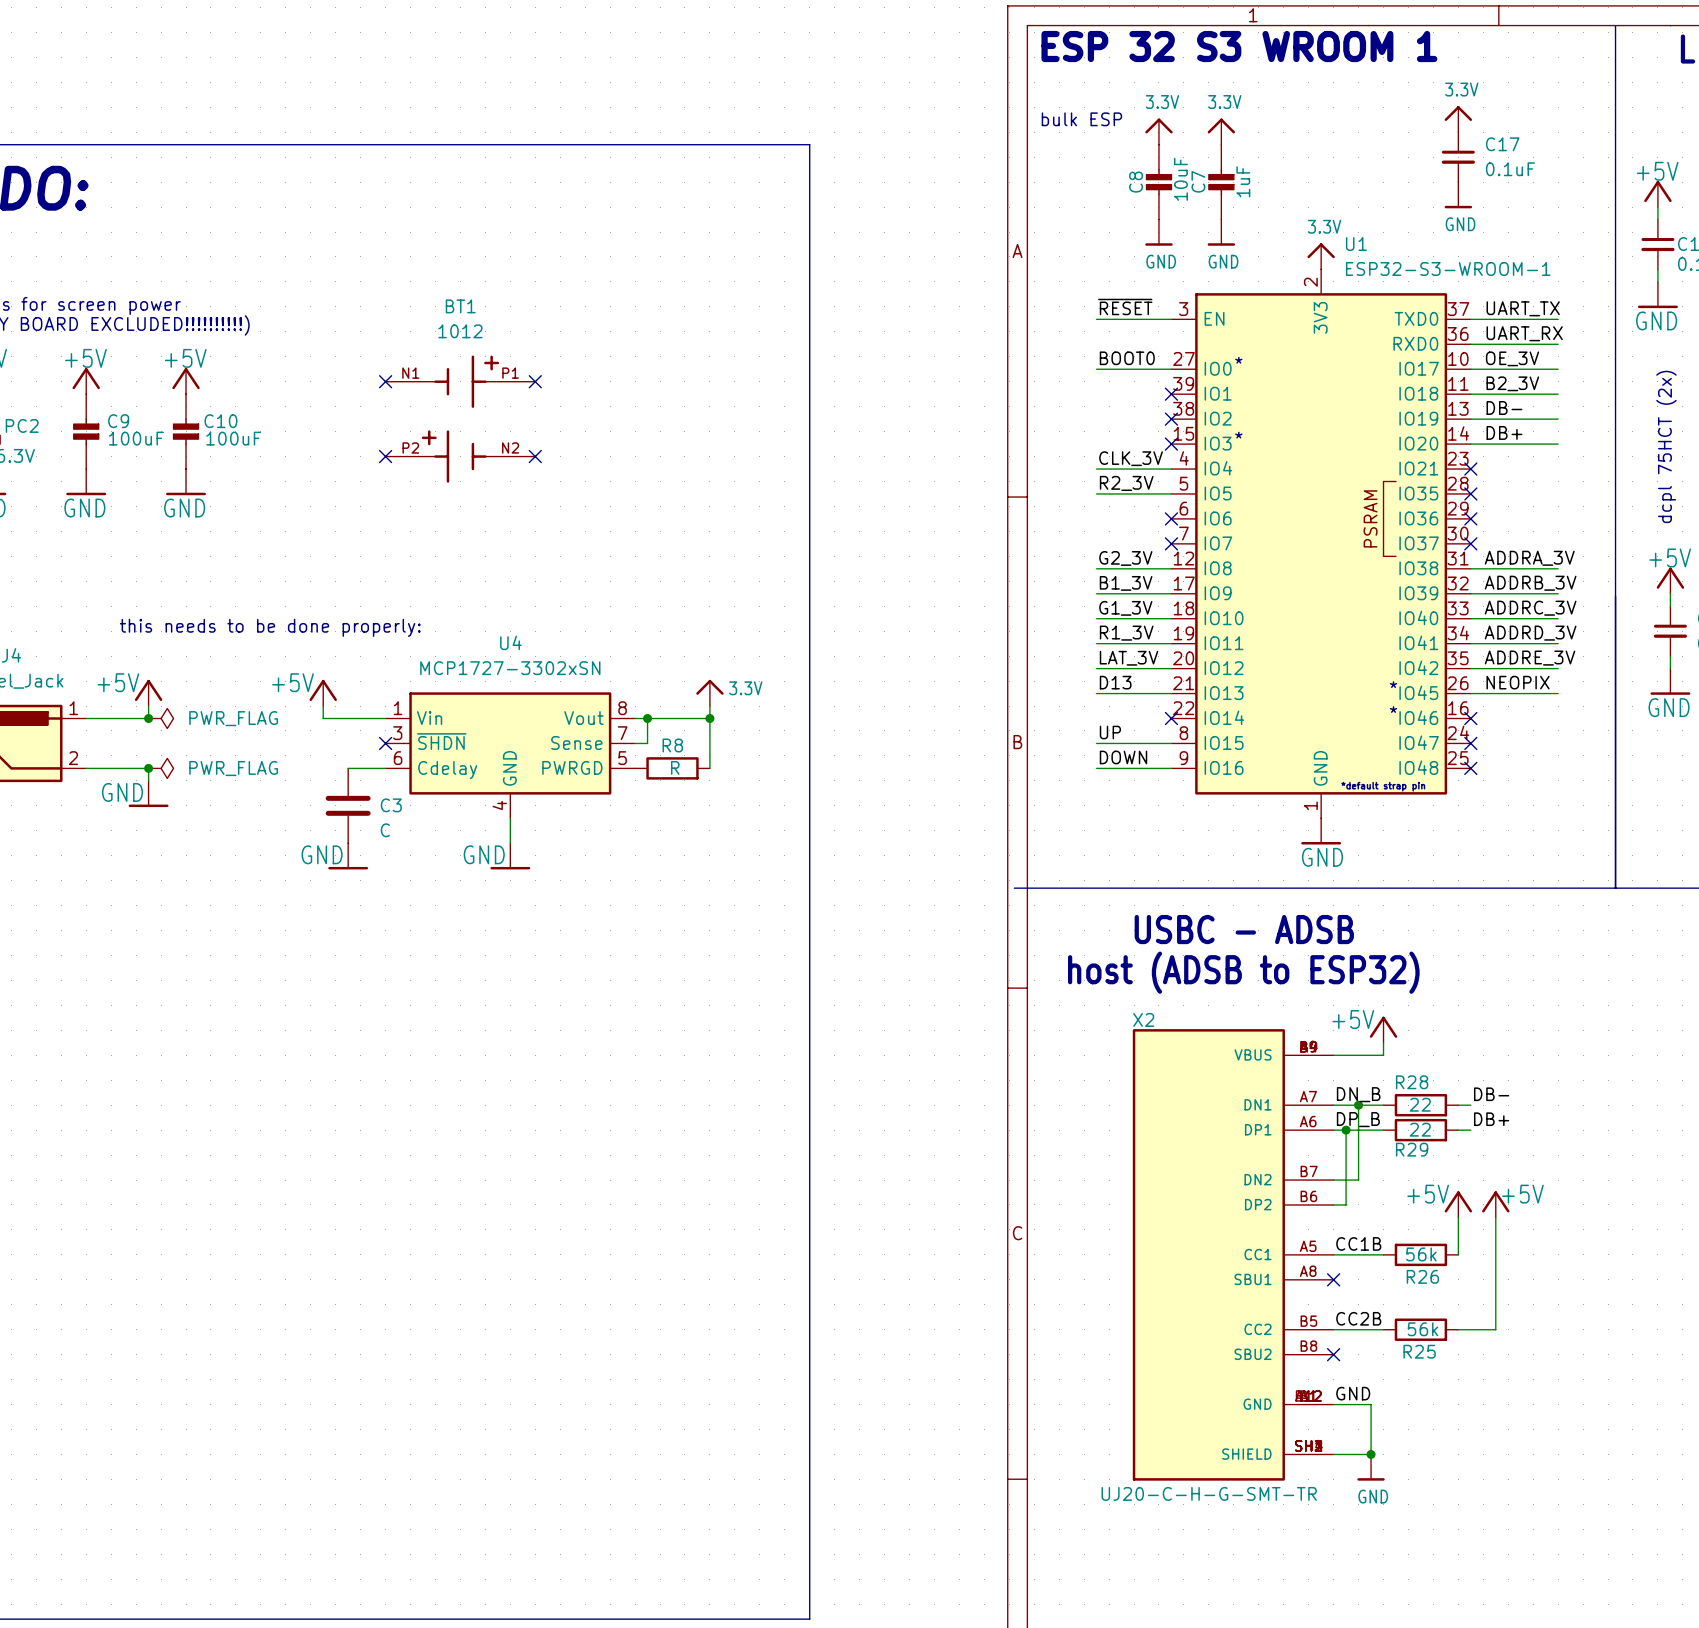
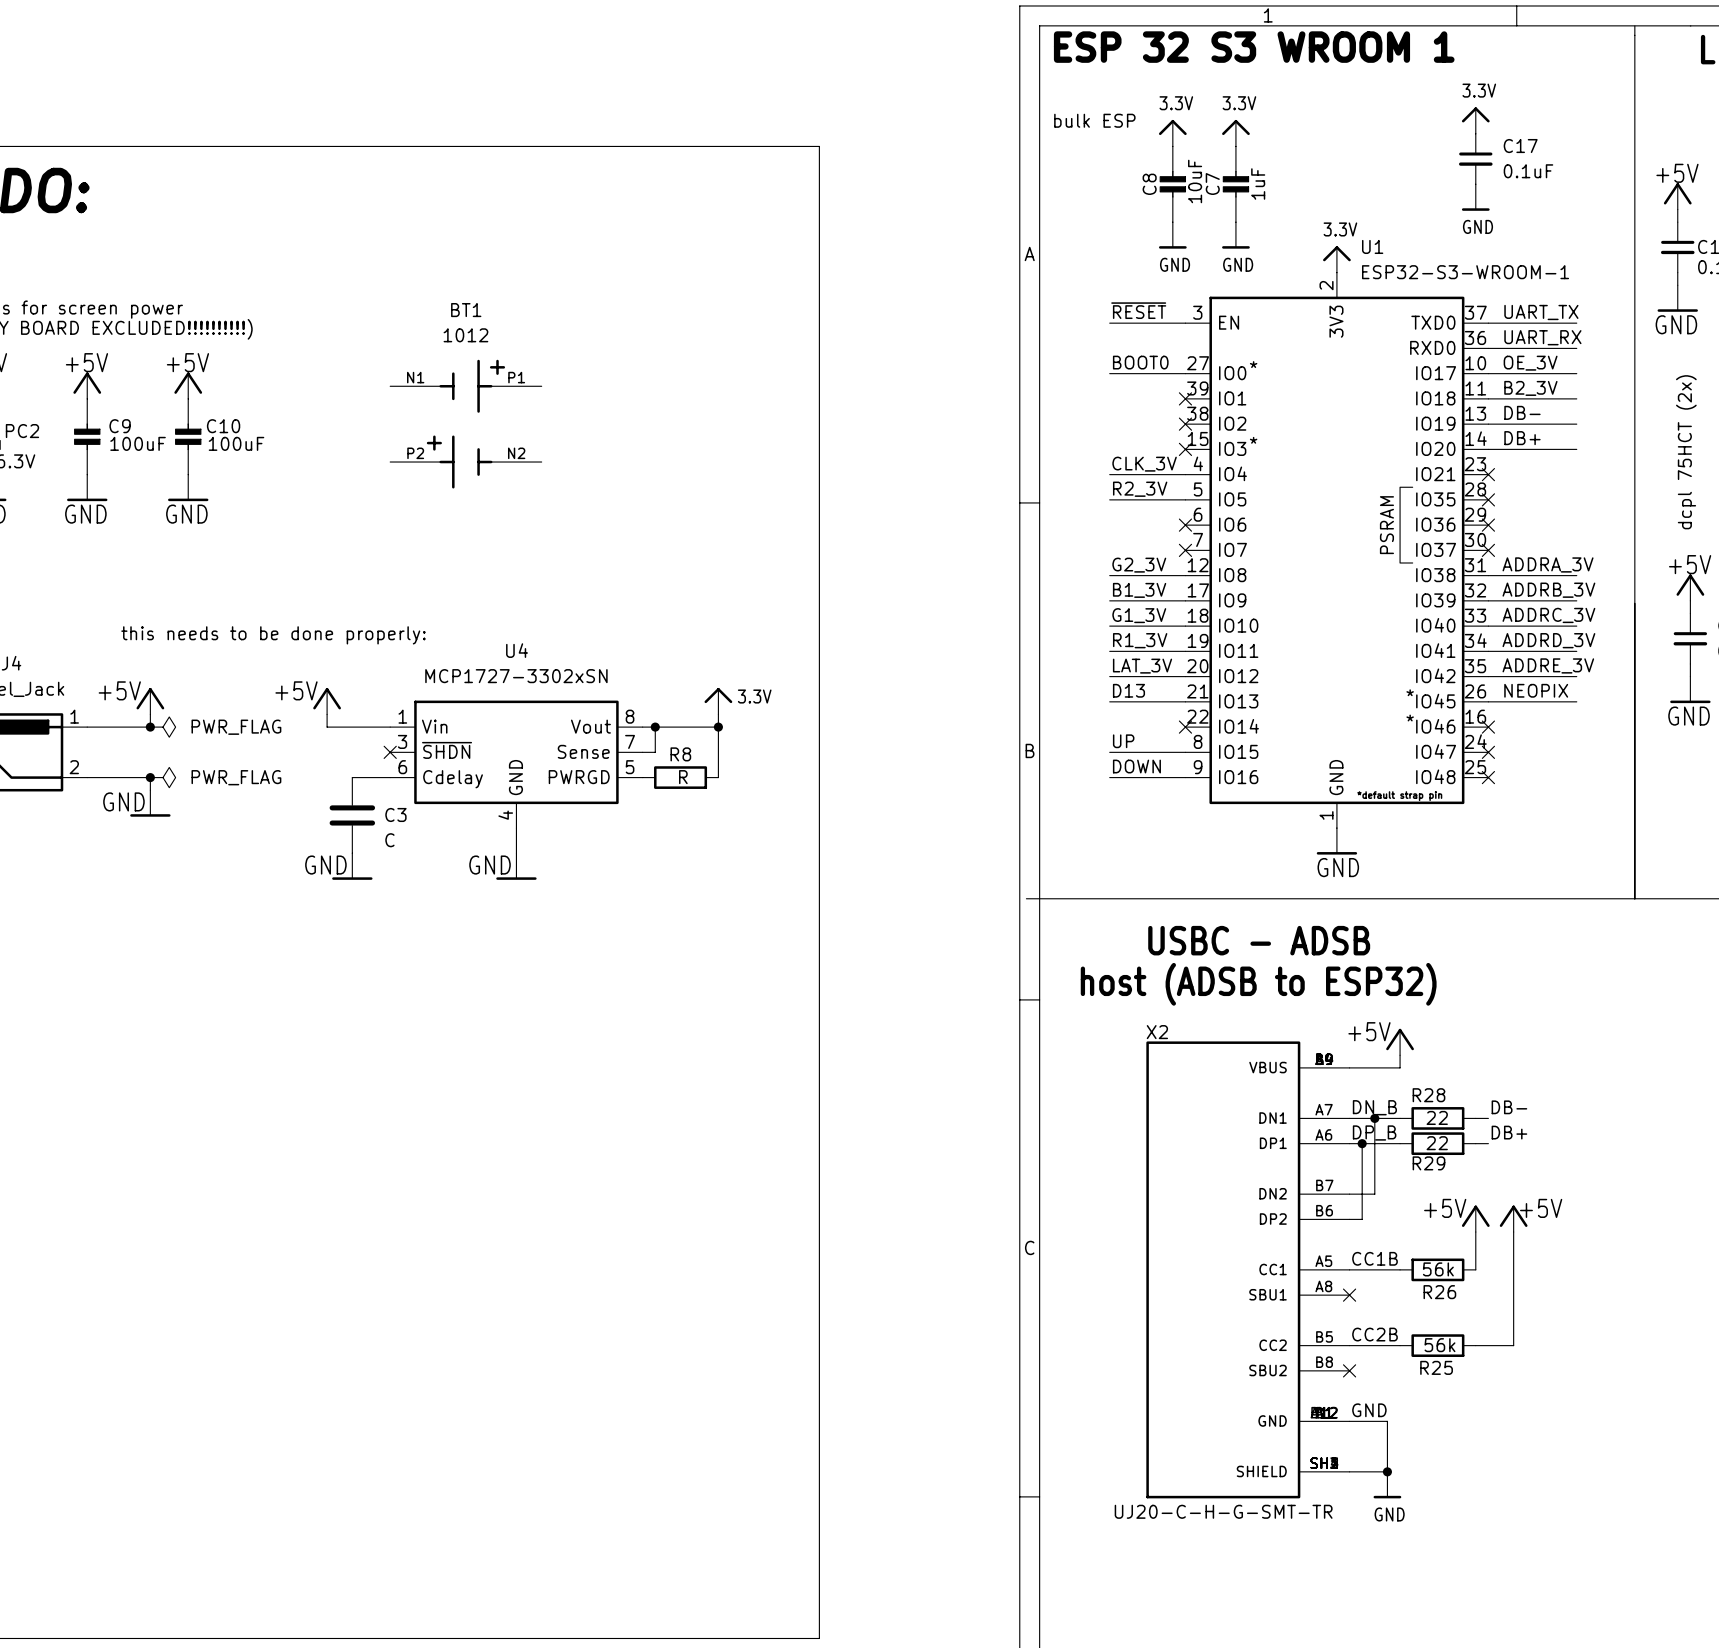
no-connect mark: (385, 381) -> none
no-connect mark: (535, 381) -> none
no-connect mark: (385, 456) -> none
no-connect mark: (535, 456) -> none

